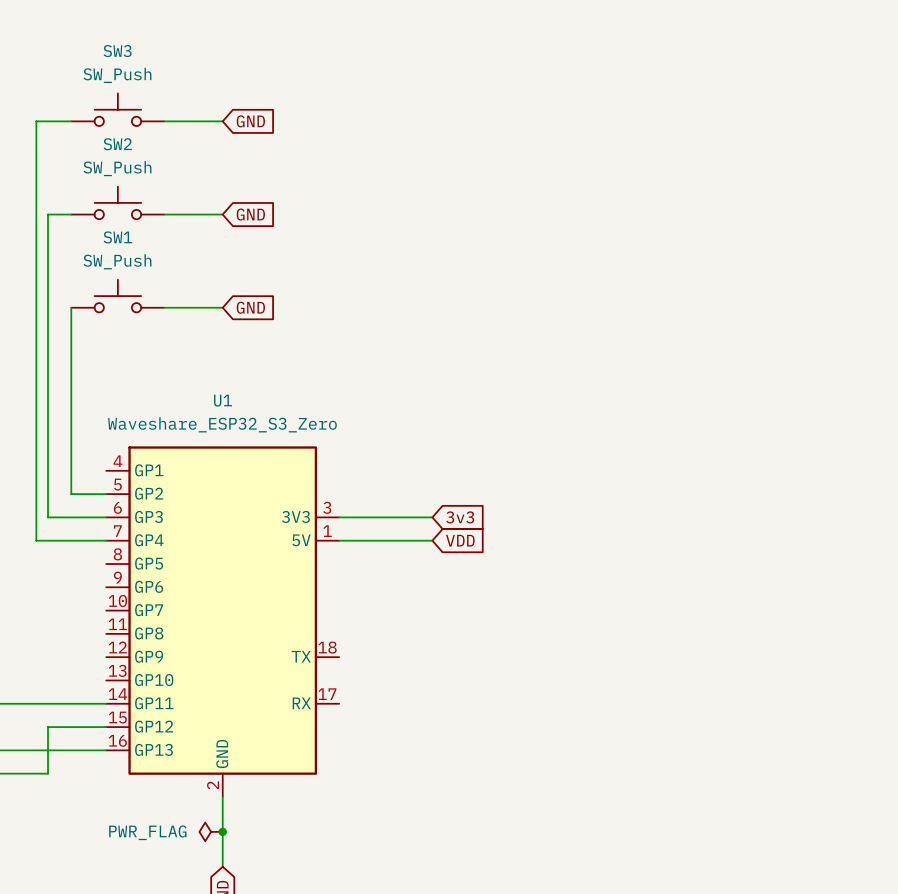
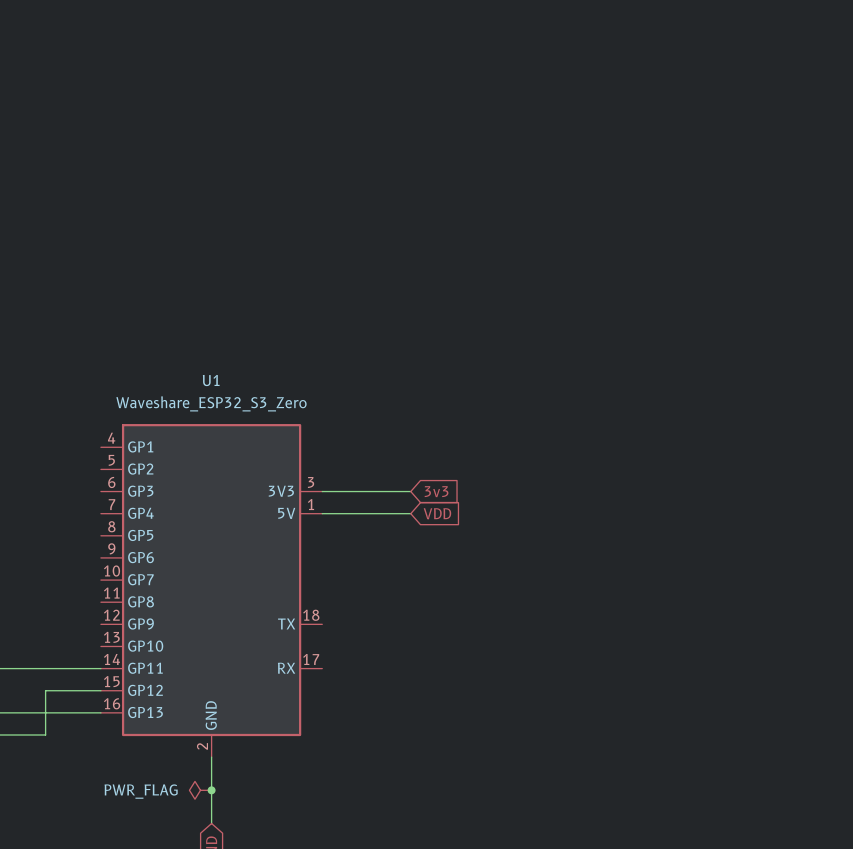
SW3: SW_Push (117, 109) -> none
wire: (71, 121) (36, 121) (36, 540) (106, 540) -> none
wire: (164, 121) (222, 121) -> none
global label: GND (250, 121) -> none
SW2: SW_Push (117, 202) -> none
wire: (71, 214) (48, 214) (48, 517) (106, 517) -> none
wire: (164, 214) (222, 214) -> none
global label: GND (250, 214) -> none
SW1: SW_Push (117, 296) -> none
wire: (71, 307) (71, 494) (106, 494) -> none
wire: (164, 307) (222, 307) -> none
global label: GND (250, 307) -> none

